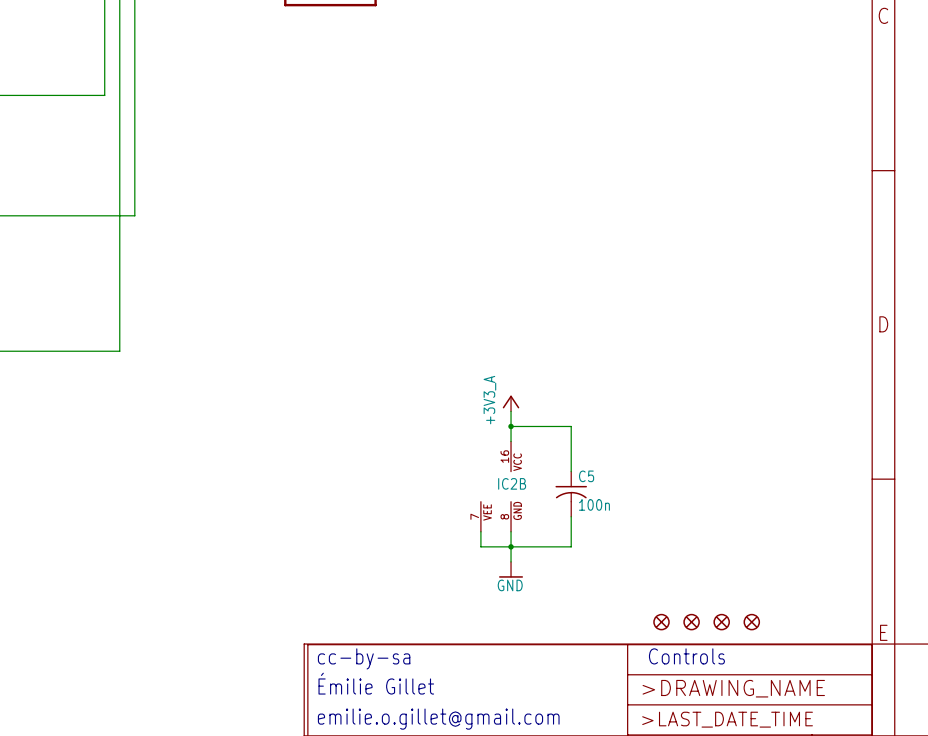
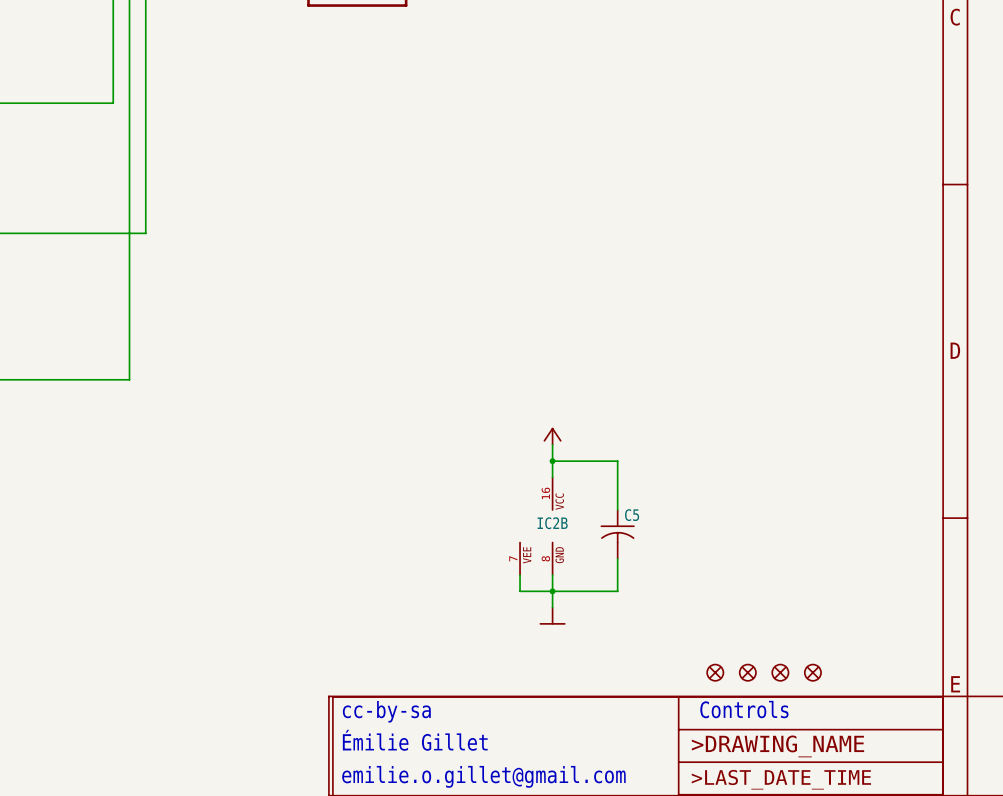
power symbol text: +3V3_A (489, 400) -> none
C5 value: 100n (594, 504) -> none
power symbol text: GND (510, 585) -> none

